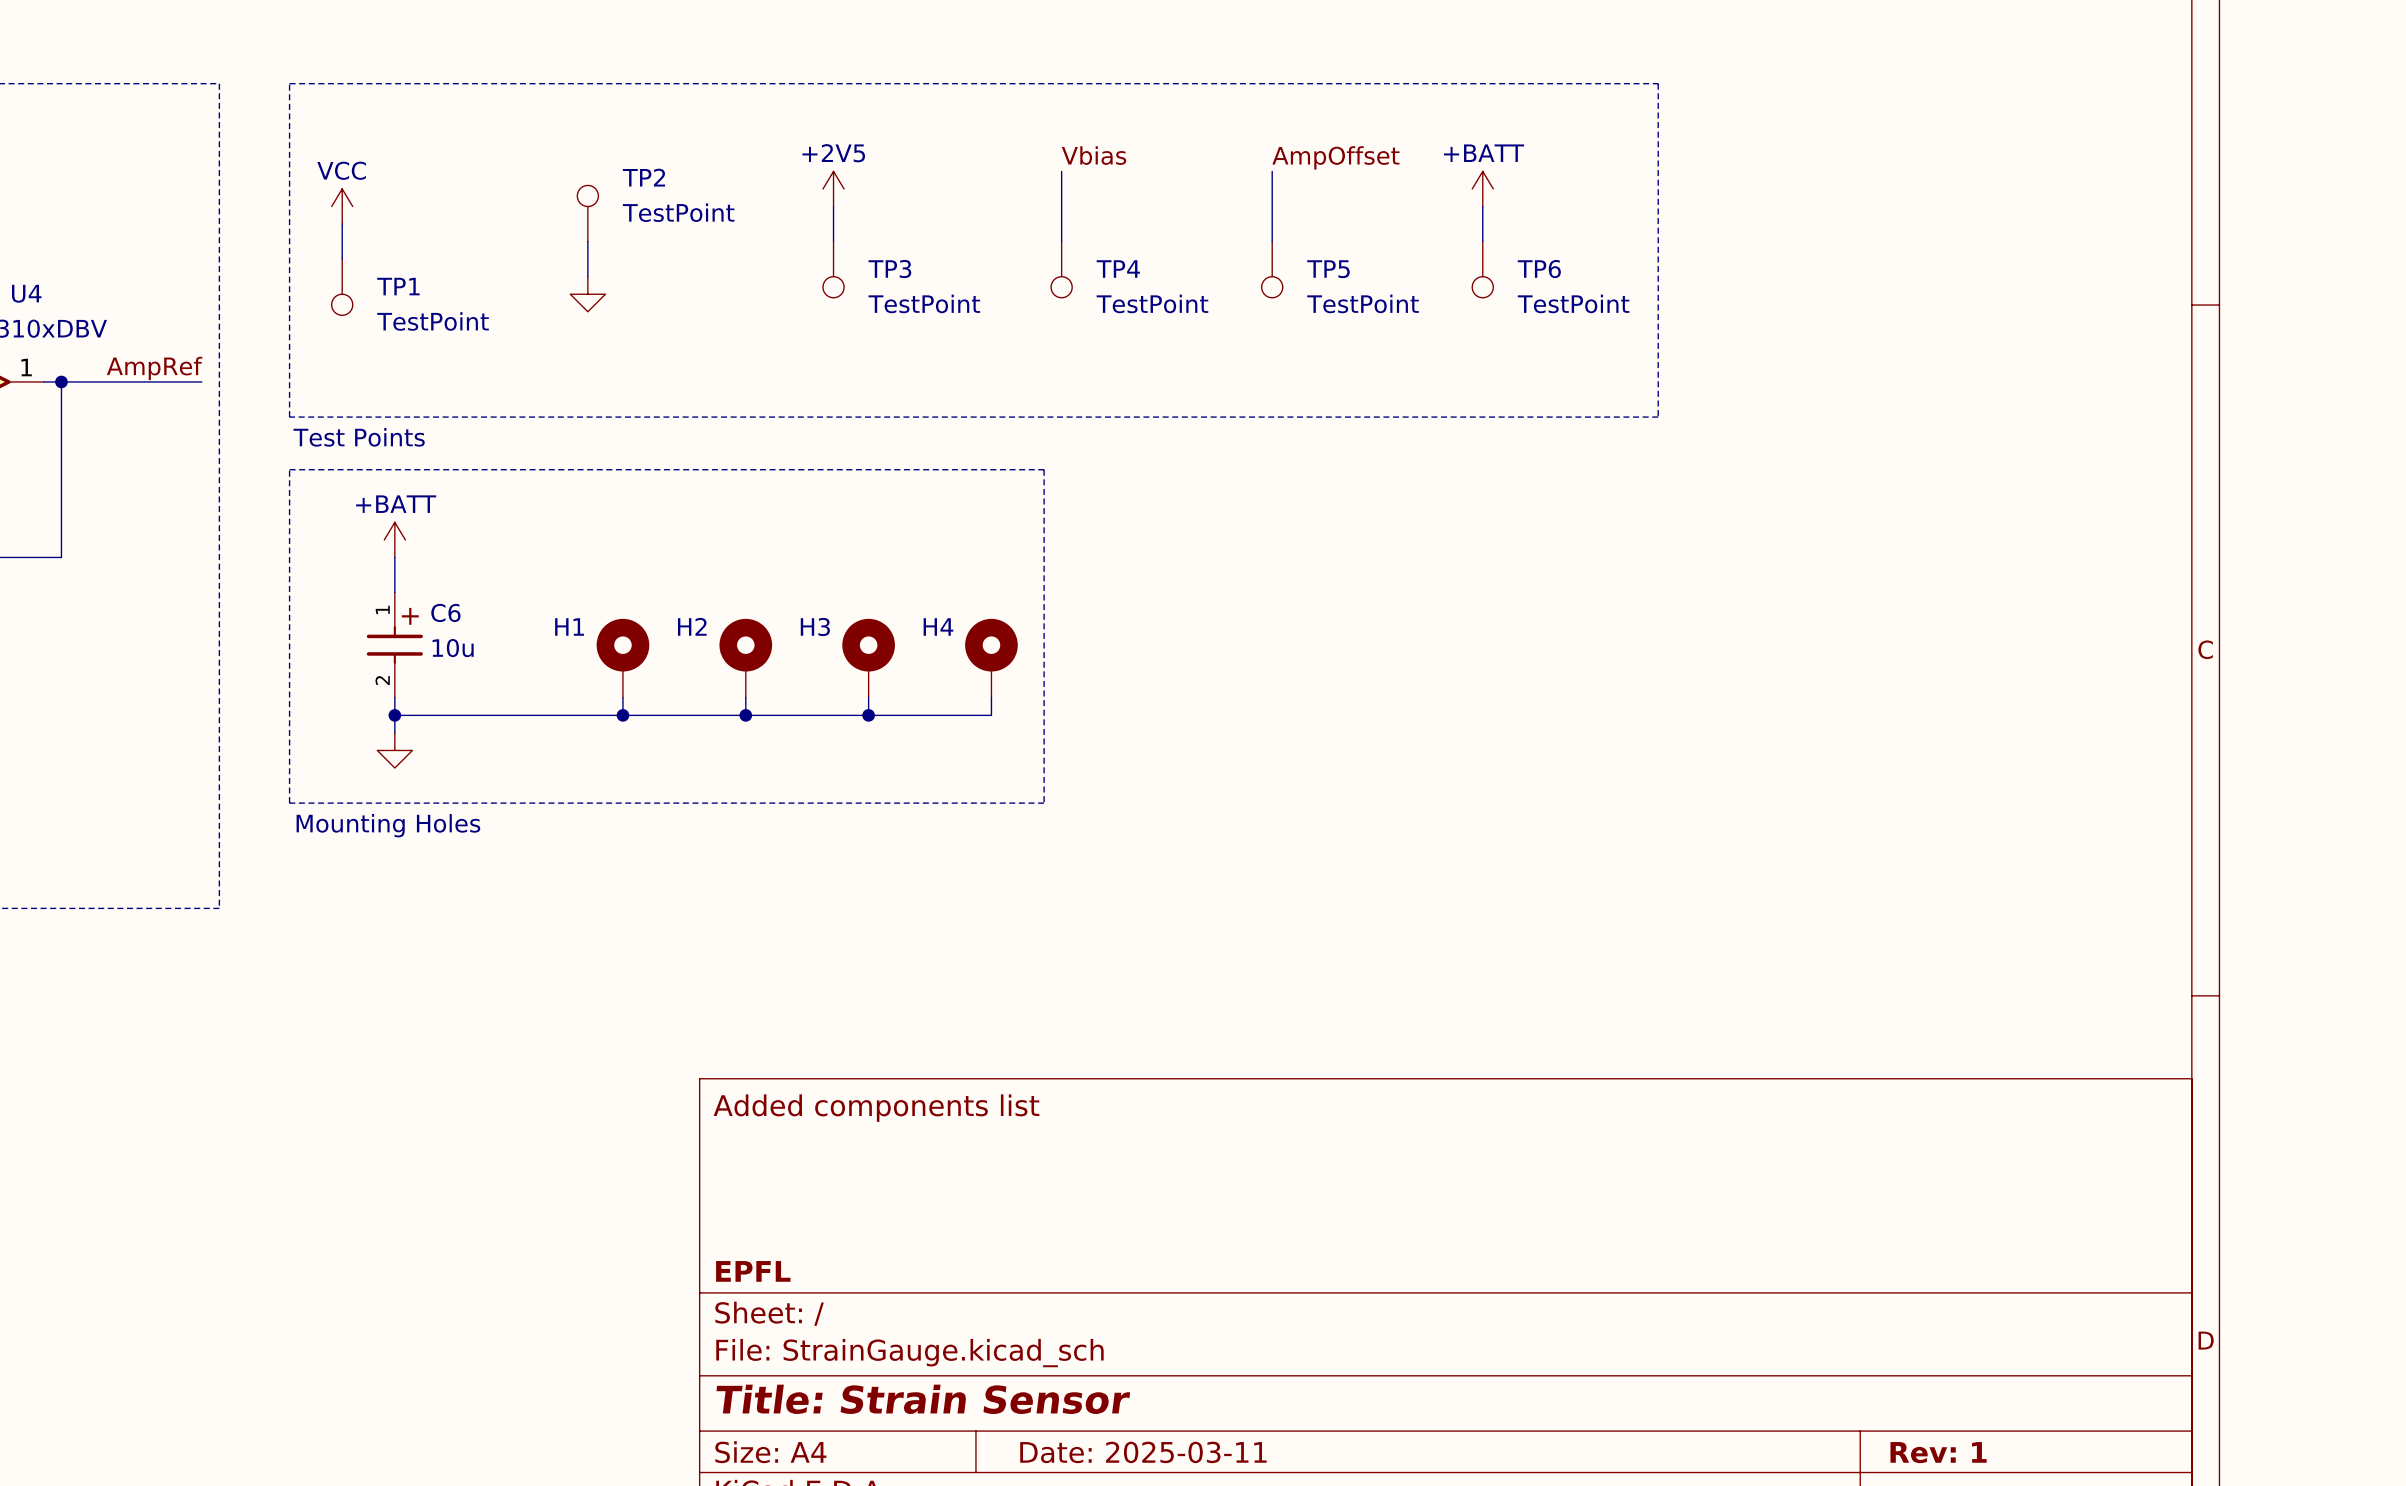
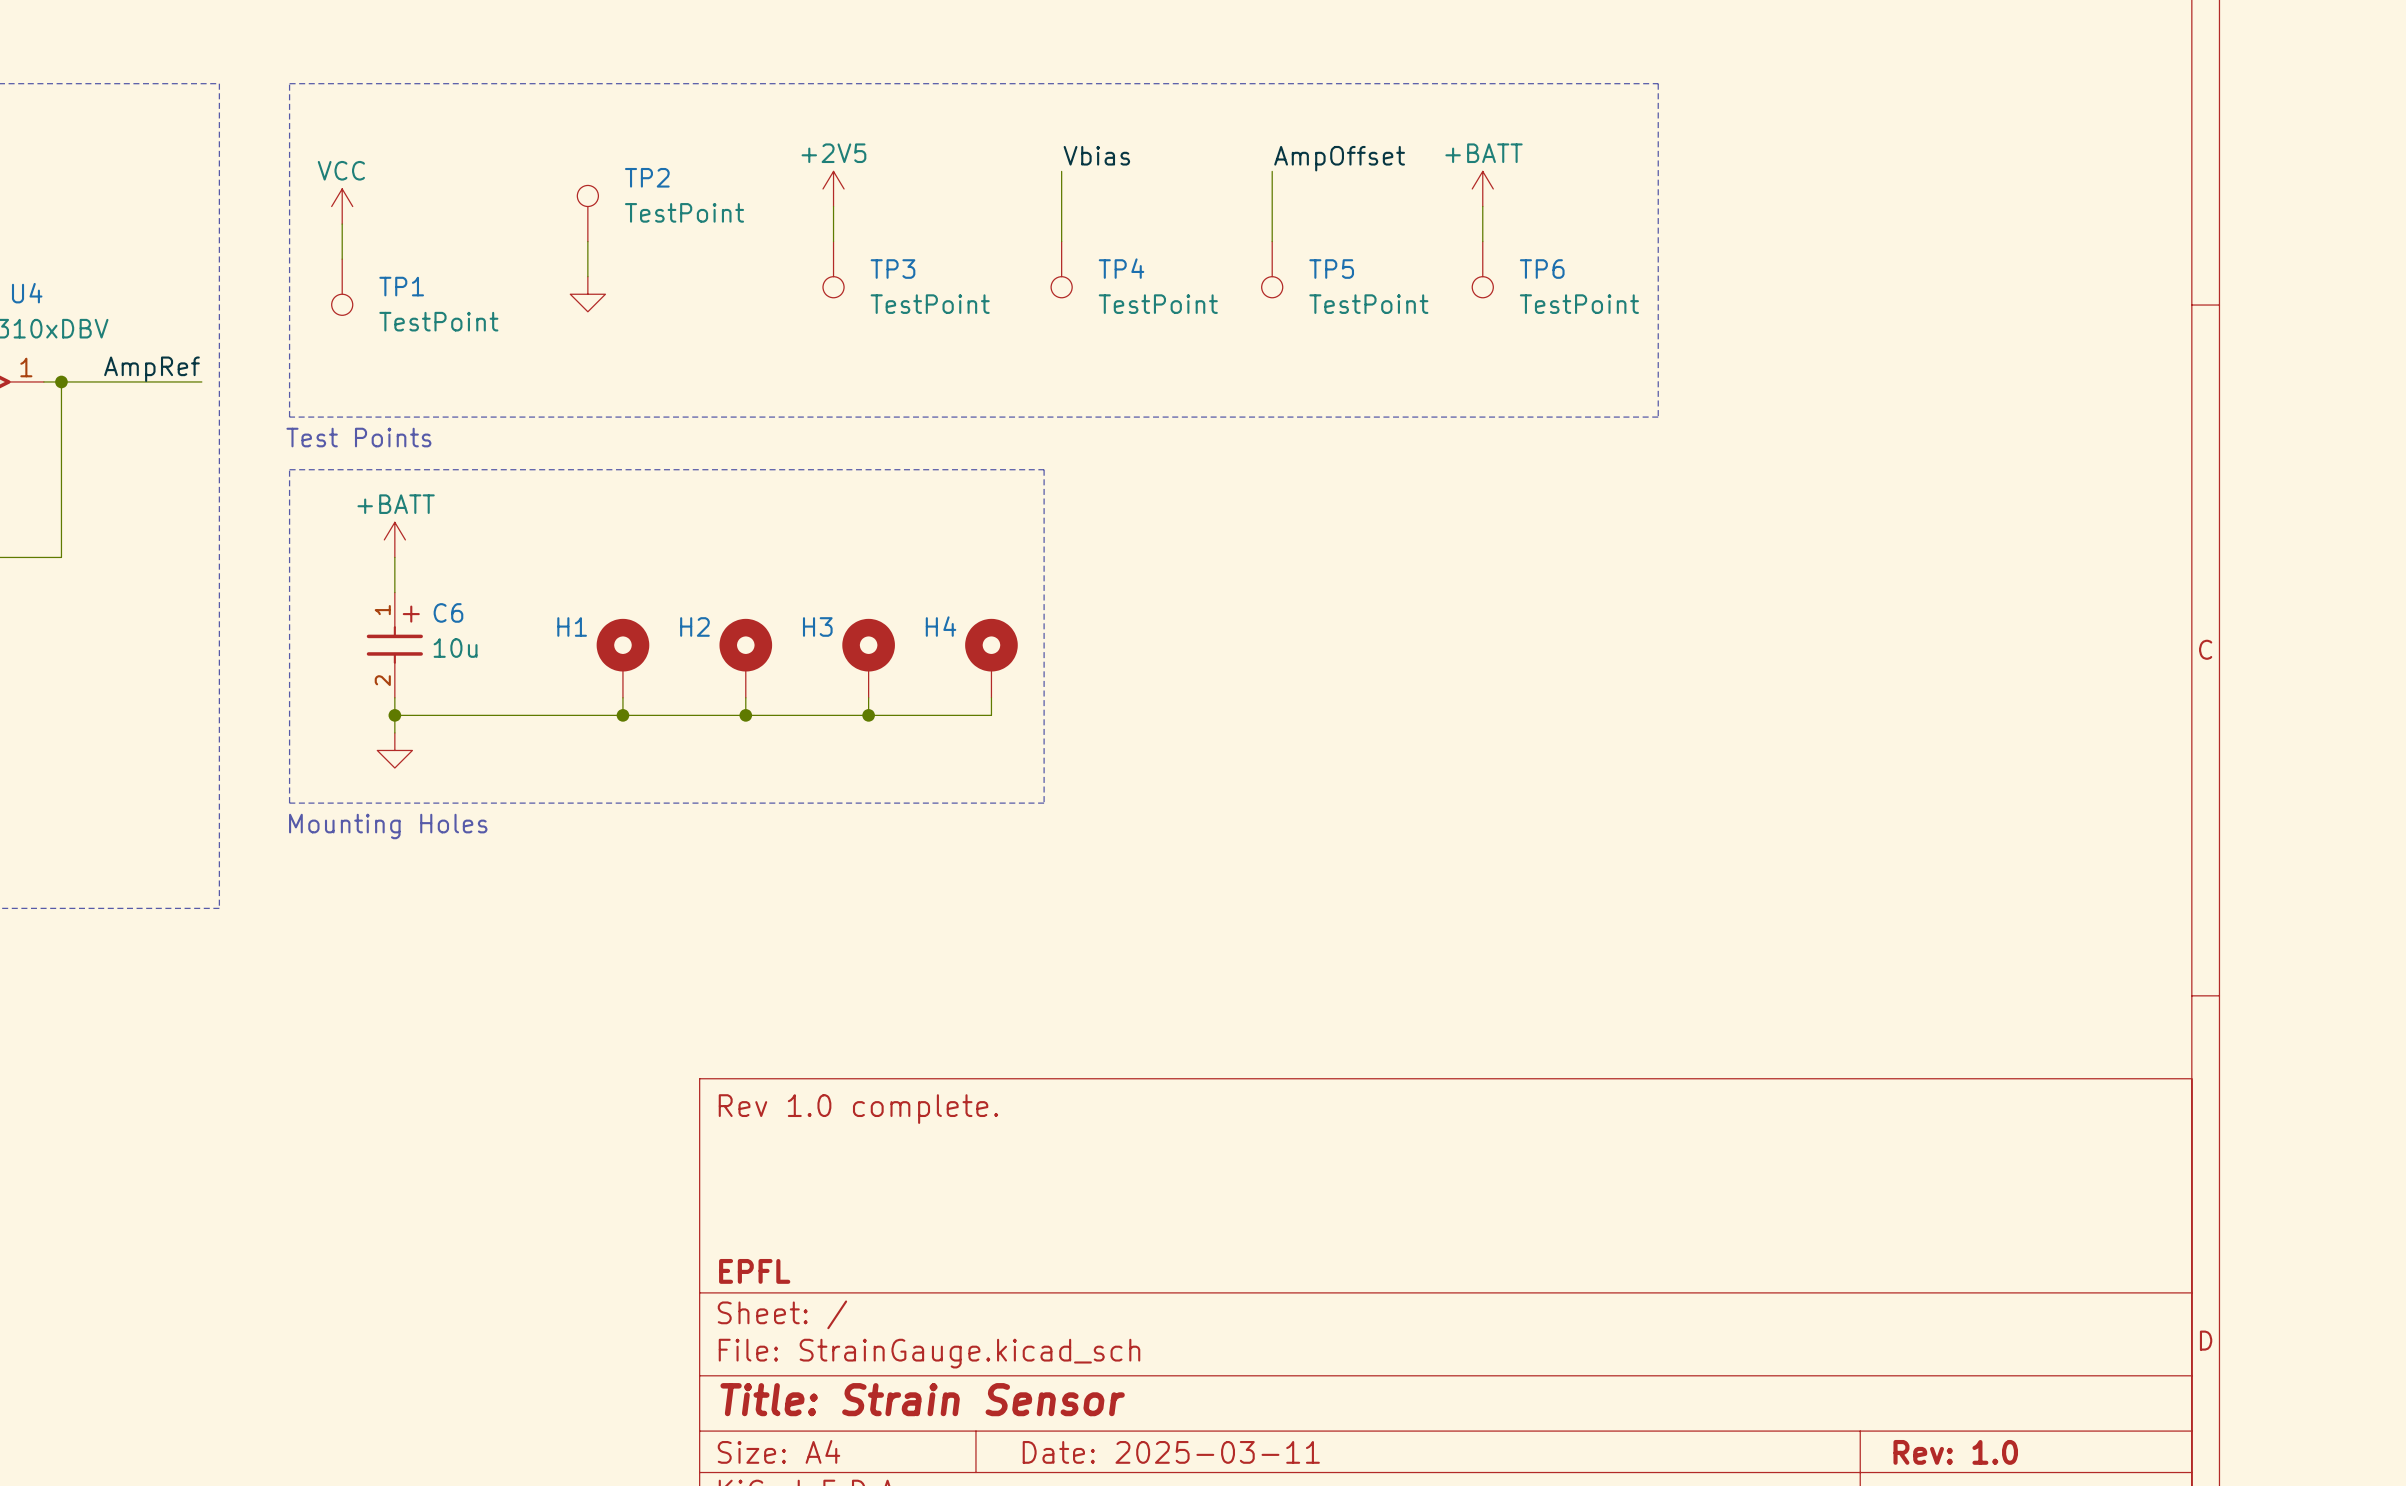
title block: Added components list (876, 1108) -> Rev 1.0 complete. (858, 1109)
title block: Rev: 1 (1938, 1452) -> Rev: 1.0 (1955, 1452)

